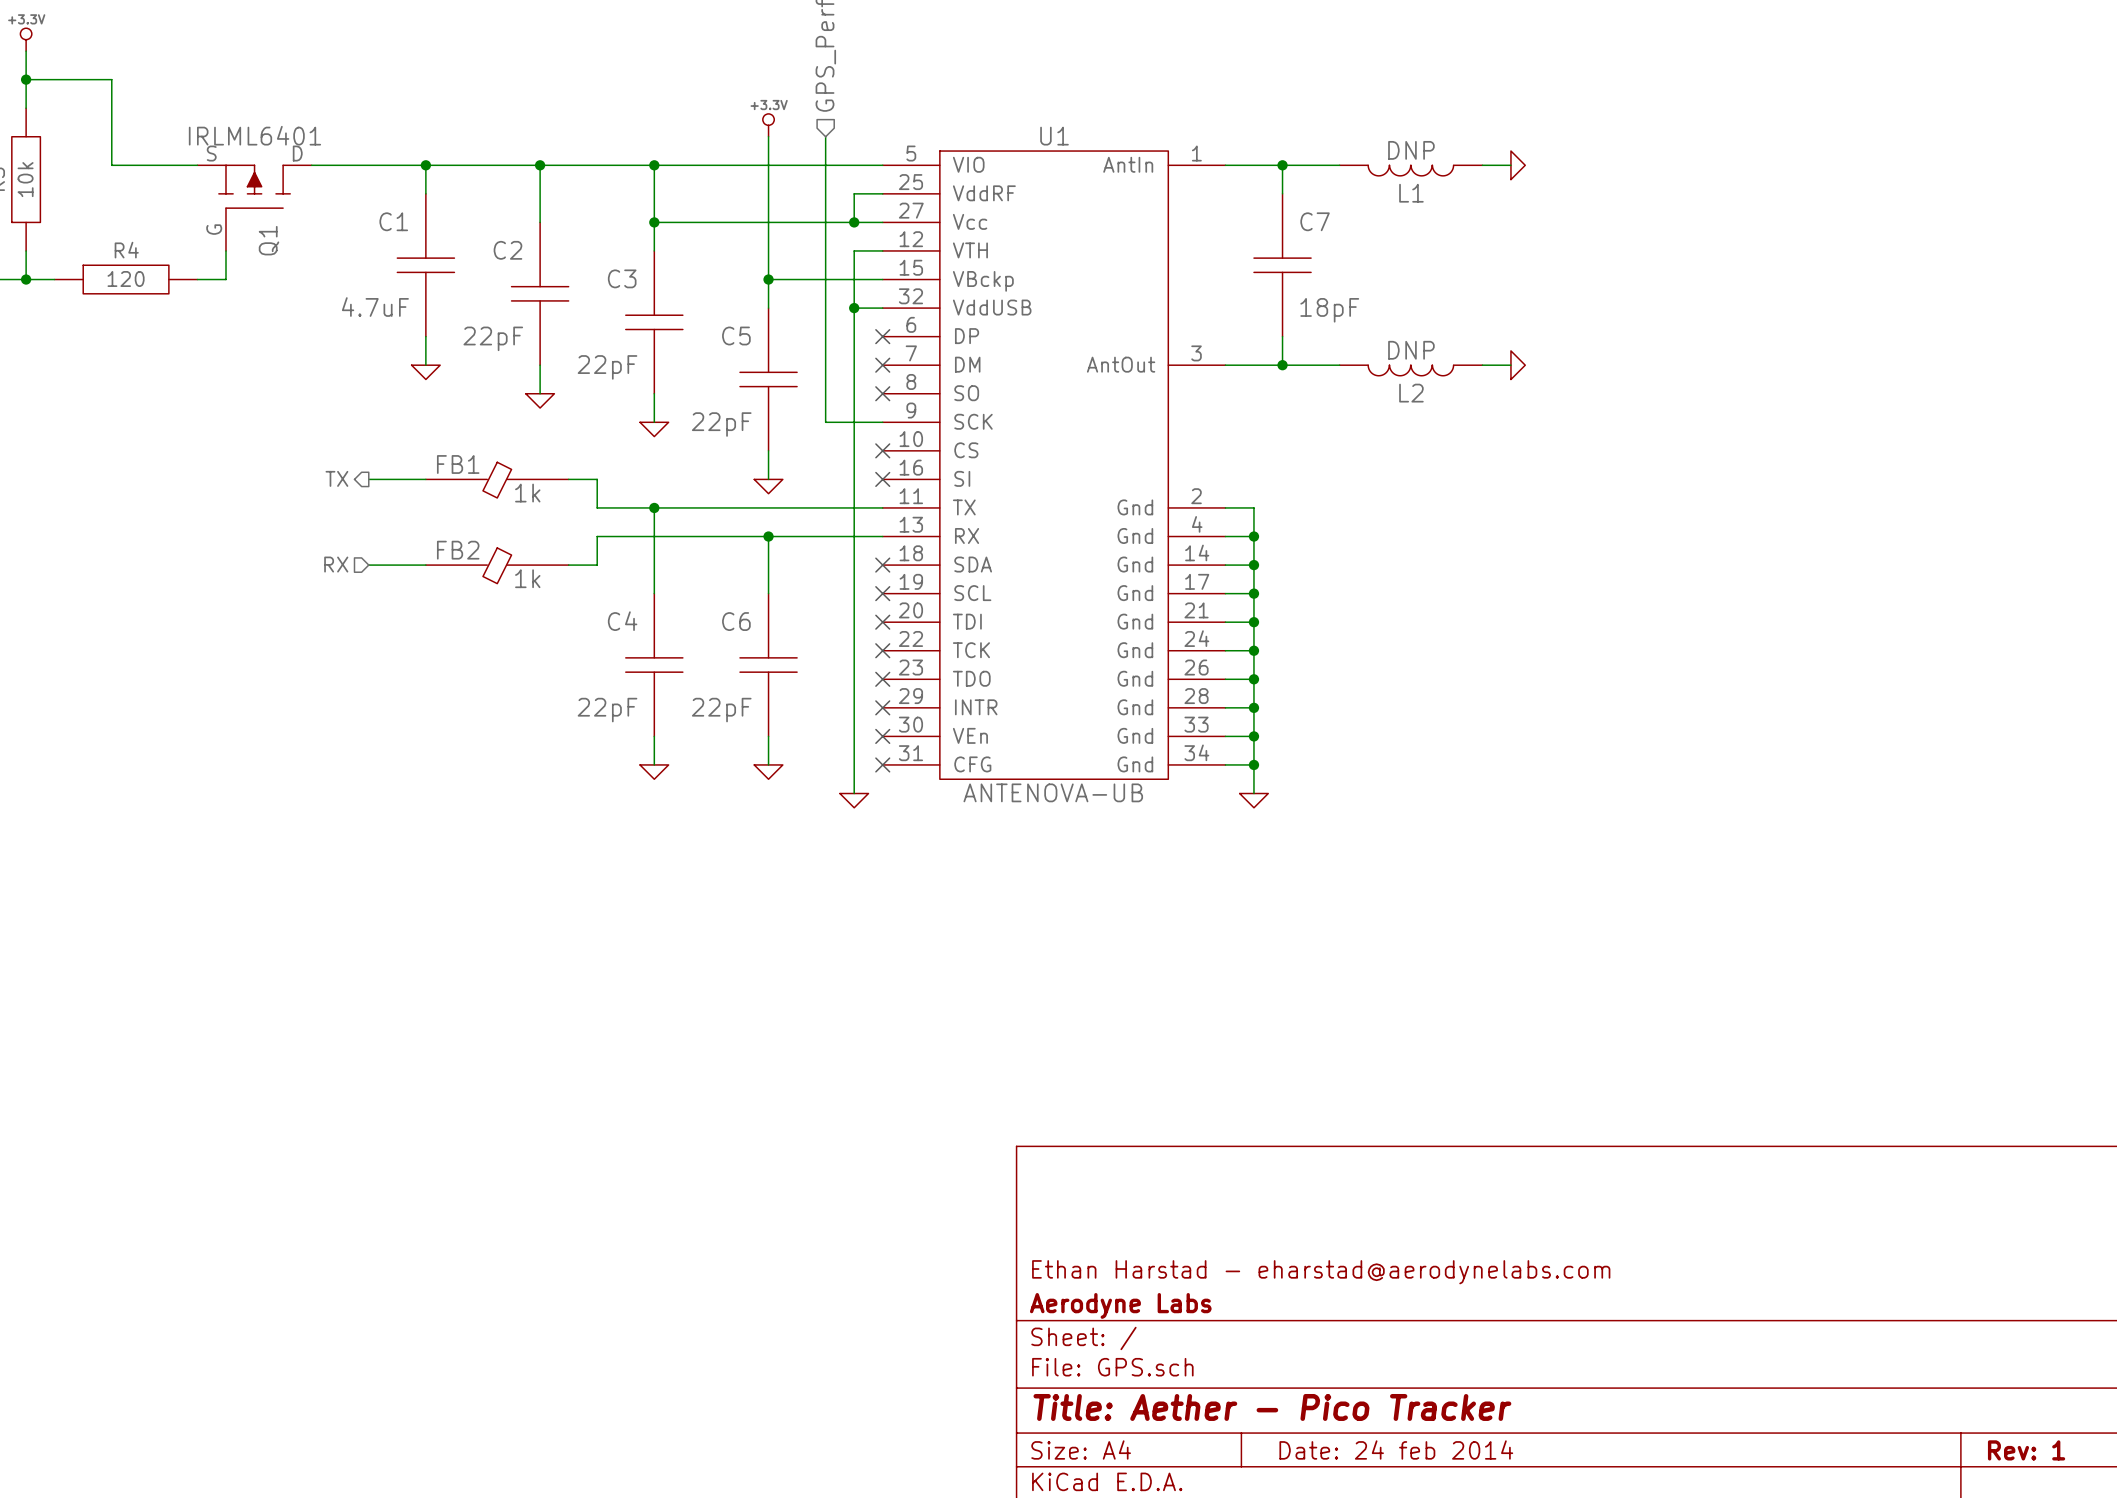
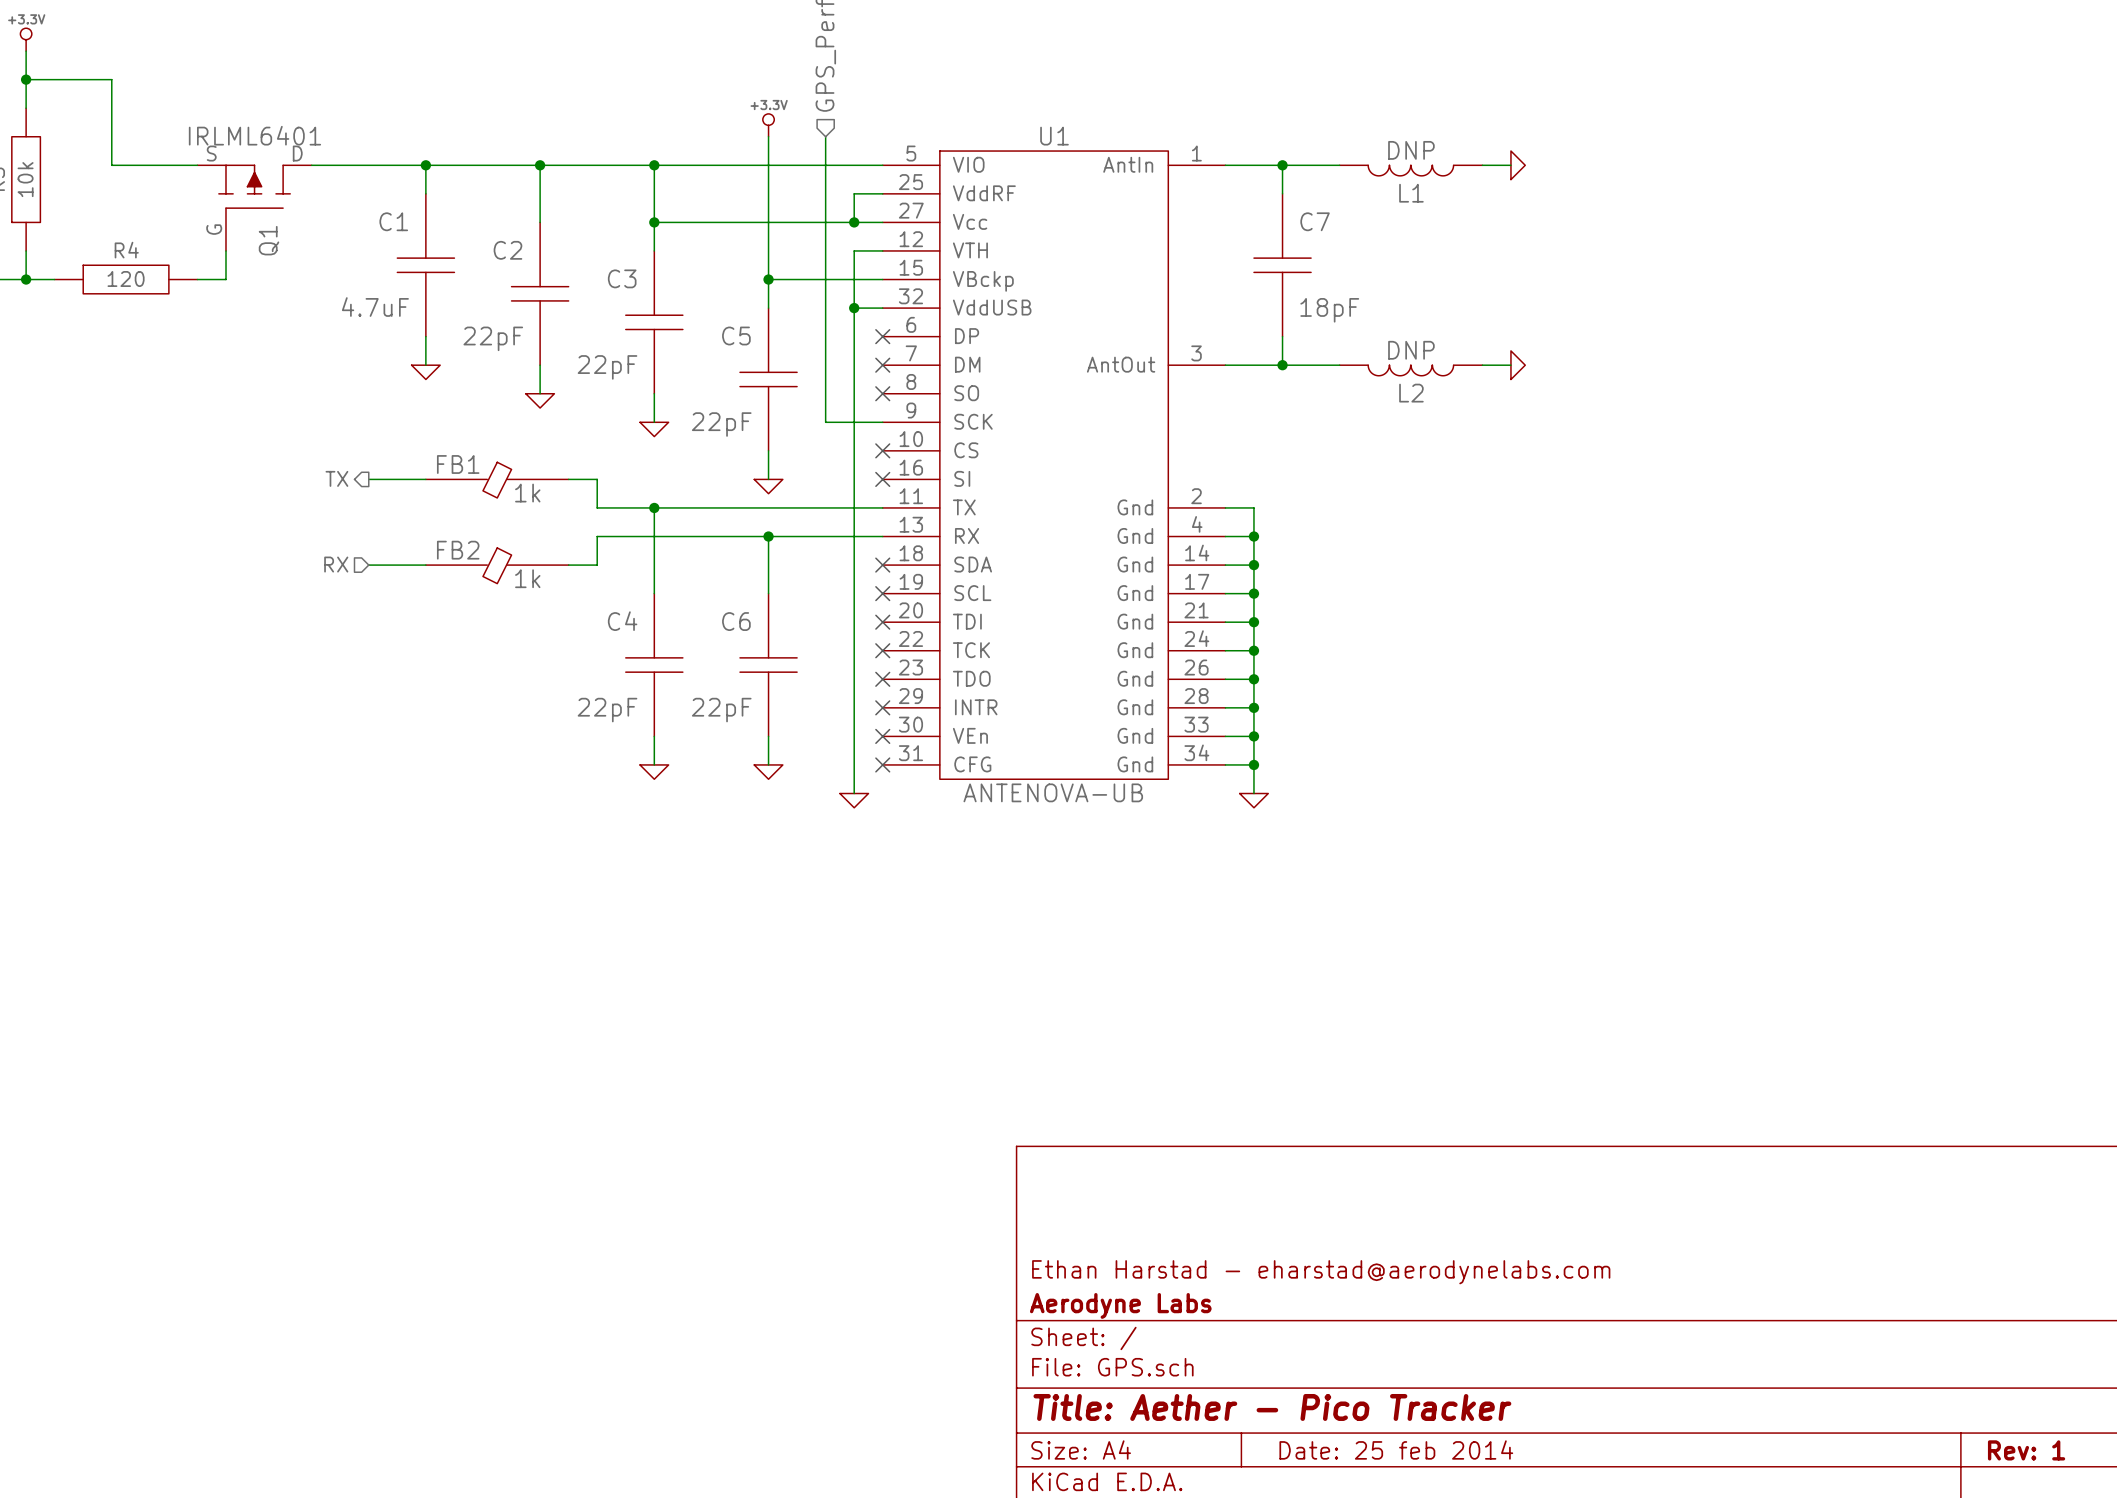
title block: Date: 24 feb 2014 (1396, 1450) -> Date: 25 feb 2014 (1396, 1450)

